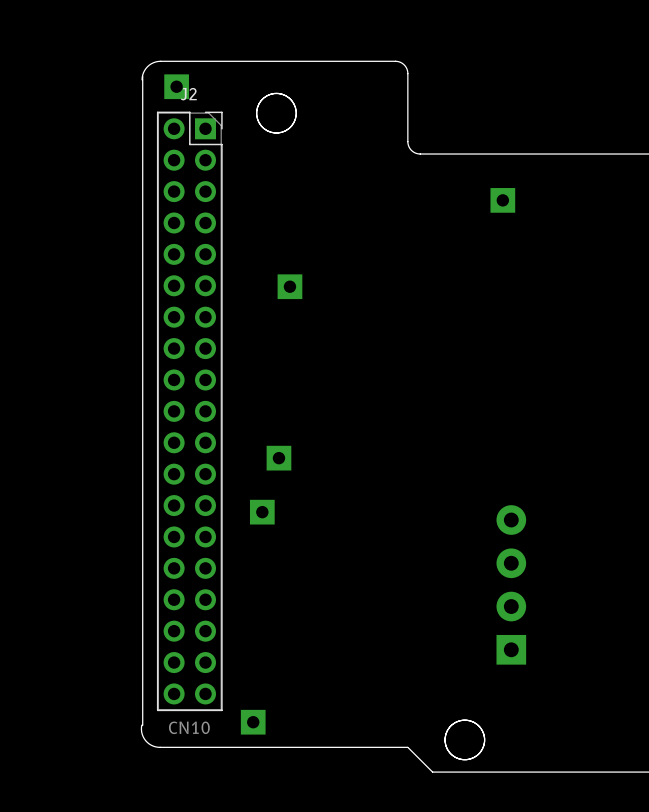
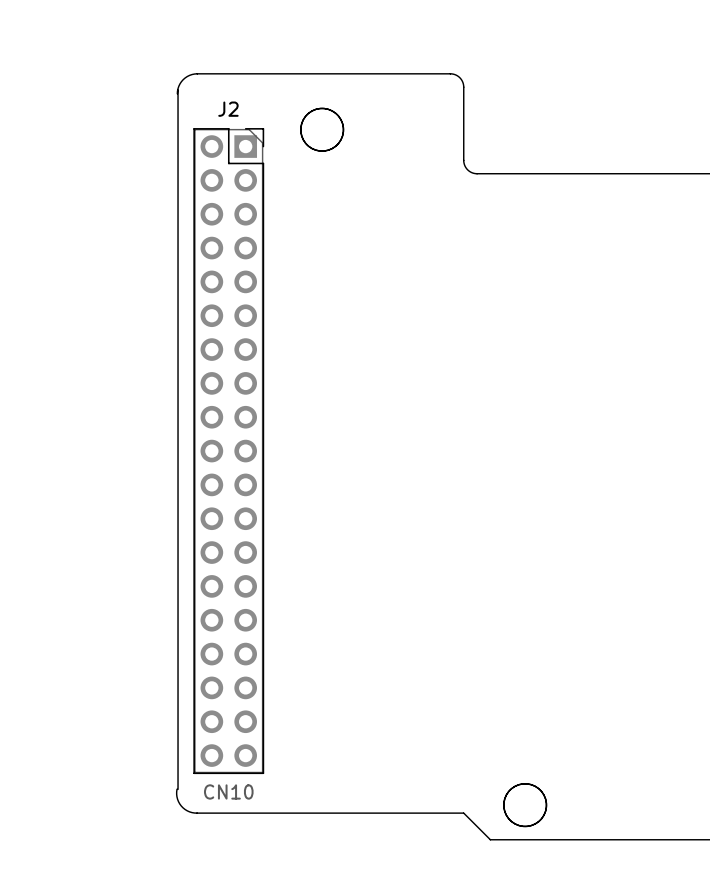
part: (176, 86) -> none
part: (502, 200) -> none
part: (289, 286) -> none
part: (278, 458) -> none
part: (262, 512) -> none
part: (511, 584) -> none
part: (253, 722) -> none

